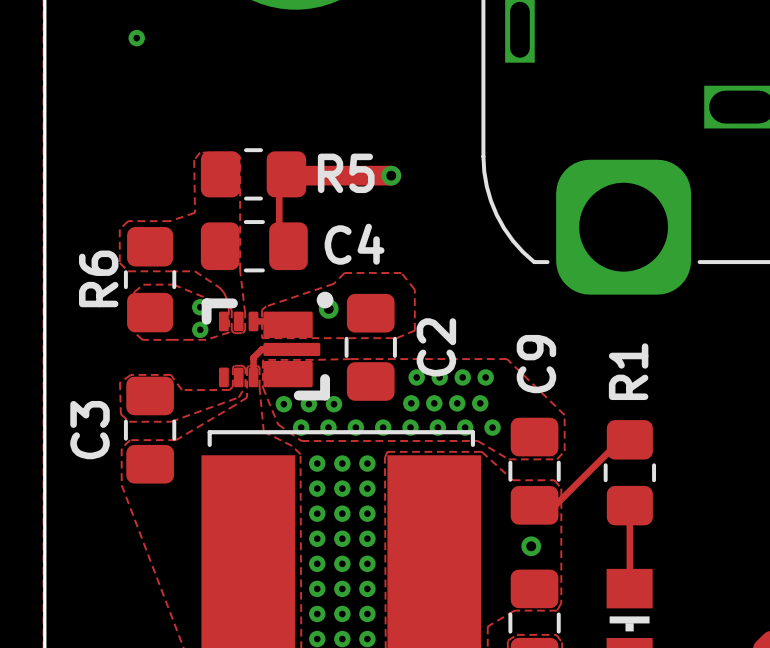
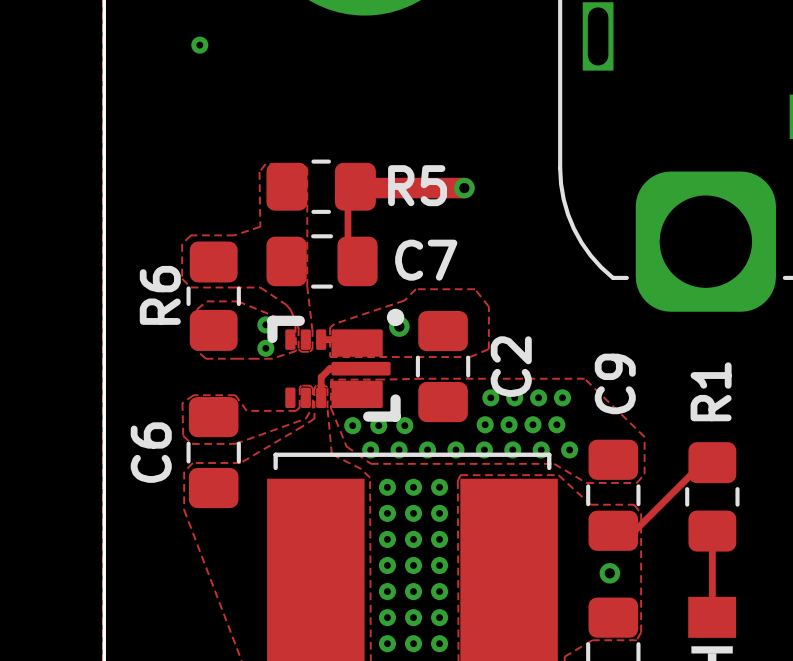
C4 name: C4 (354, 244) -> C7 (426, 260)
C3 name: C3 (90, 430) -> C6 (151, 452)

